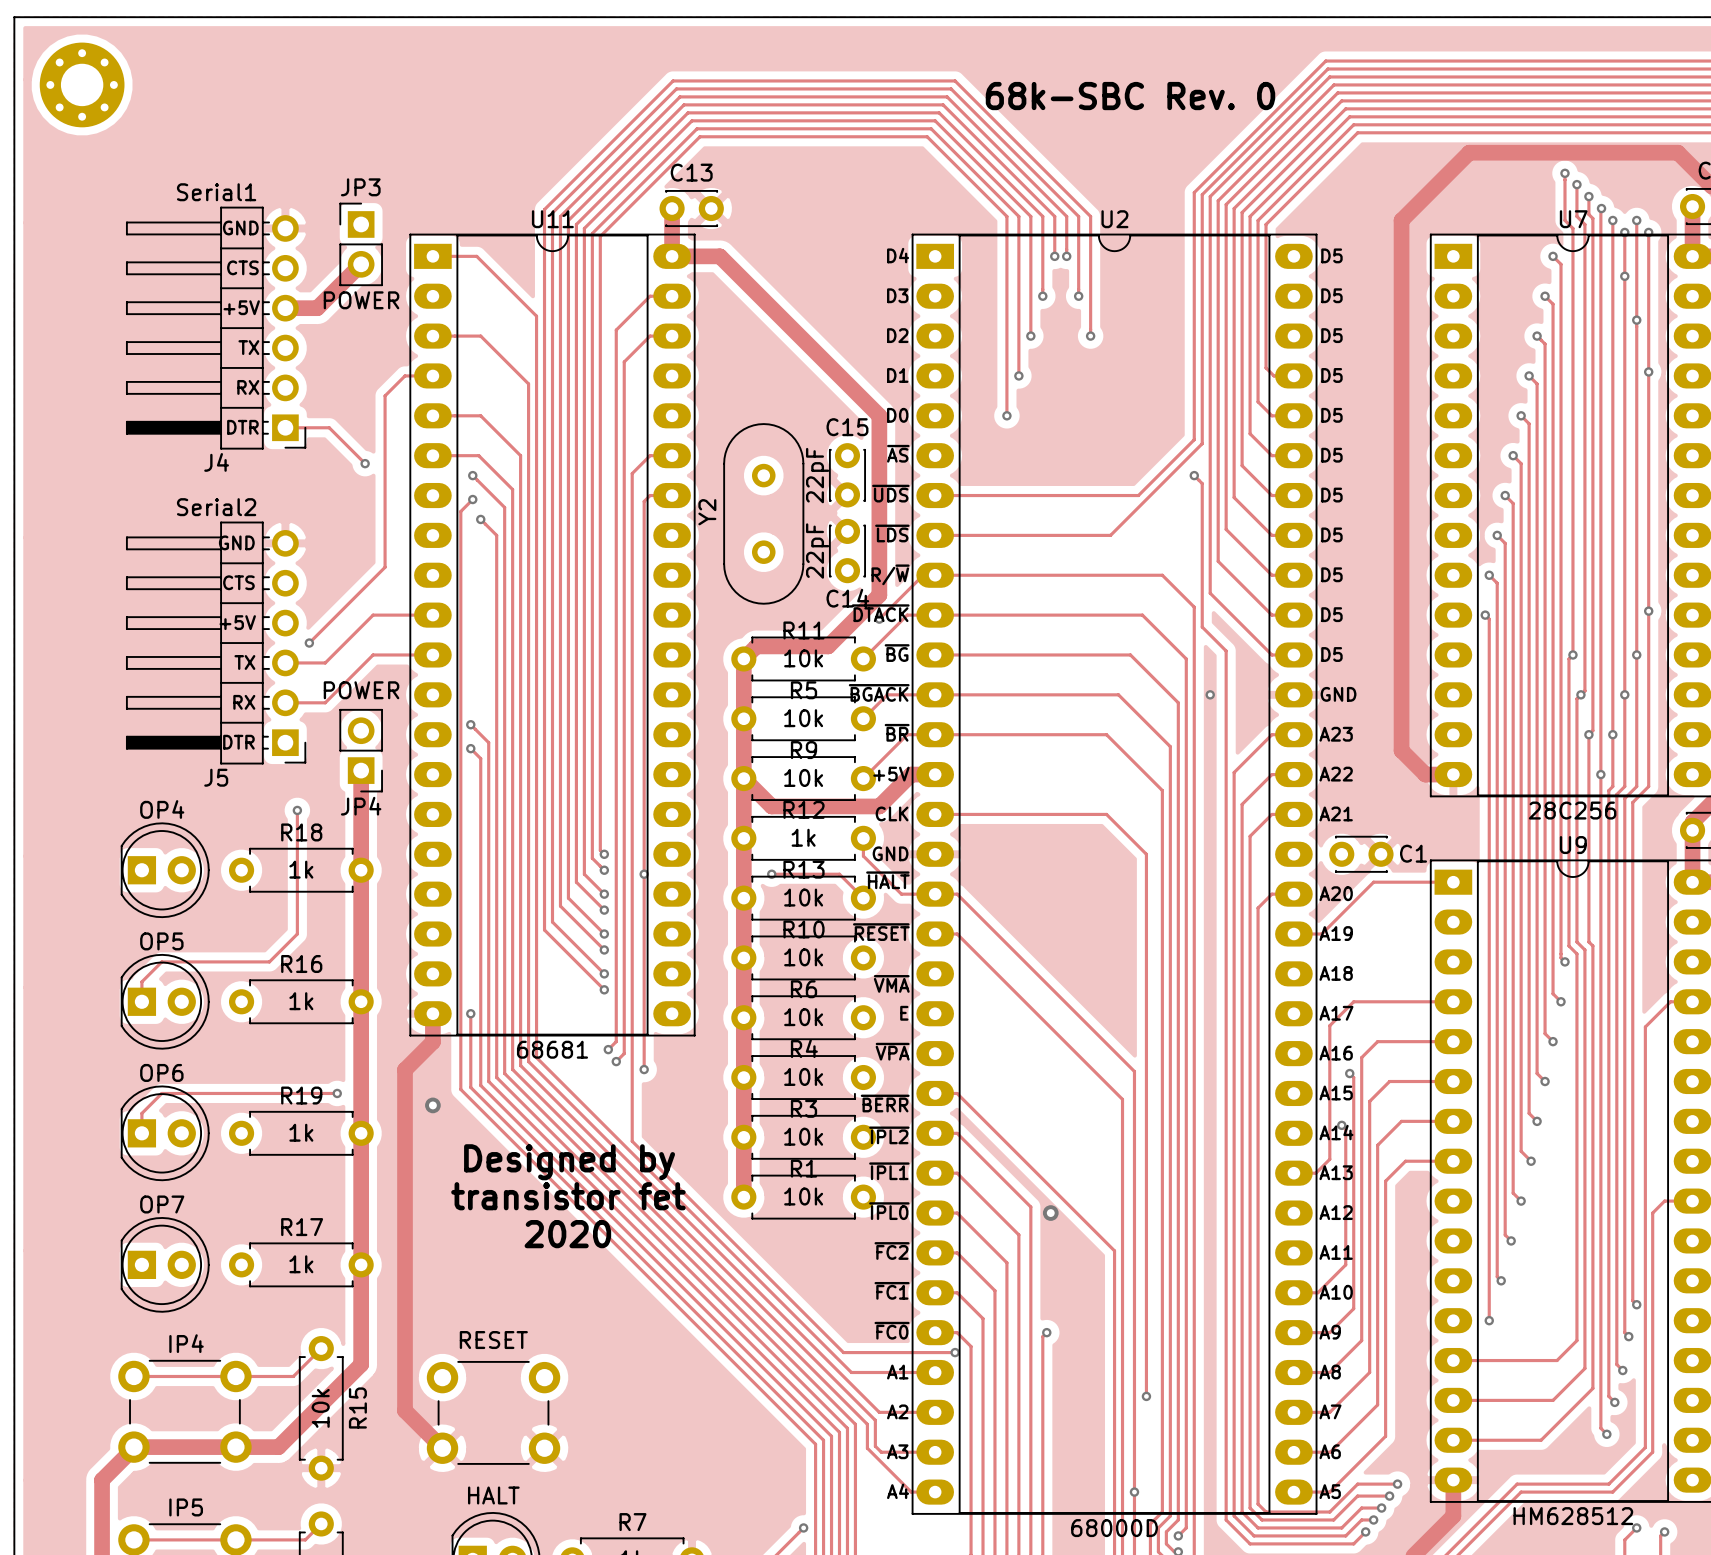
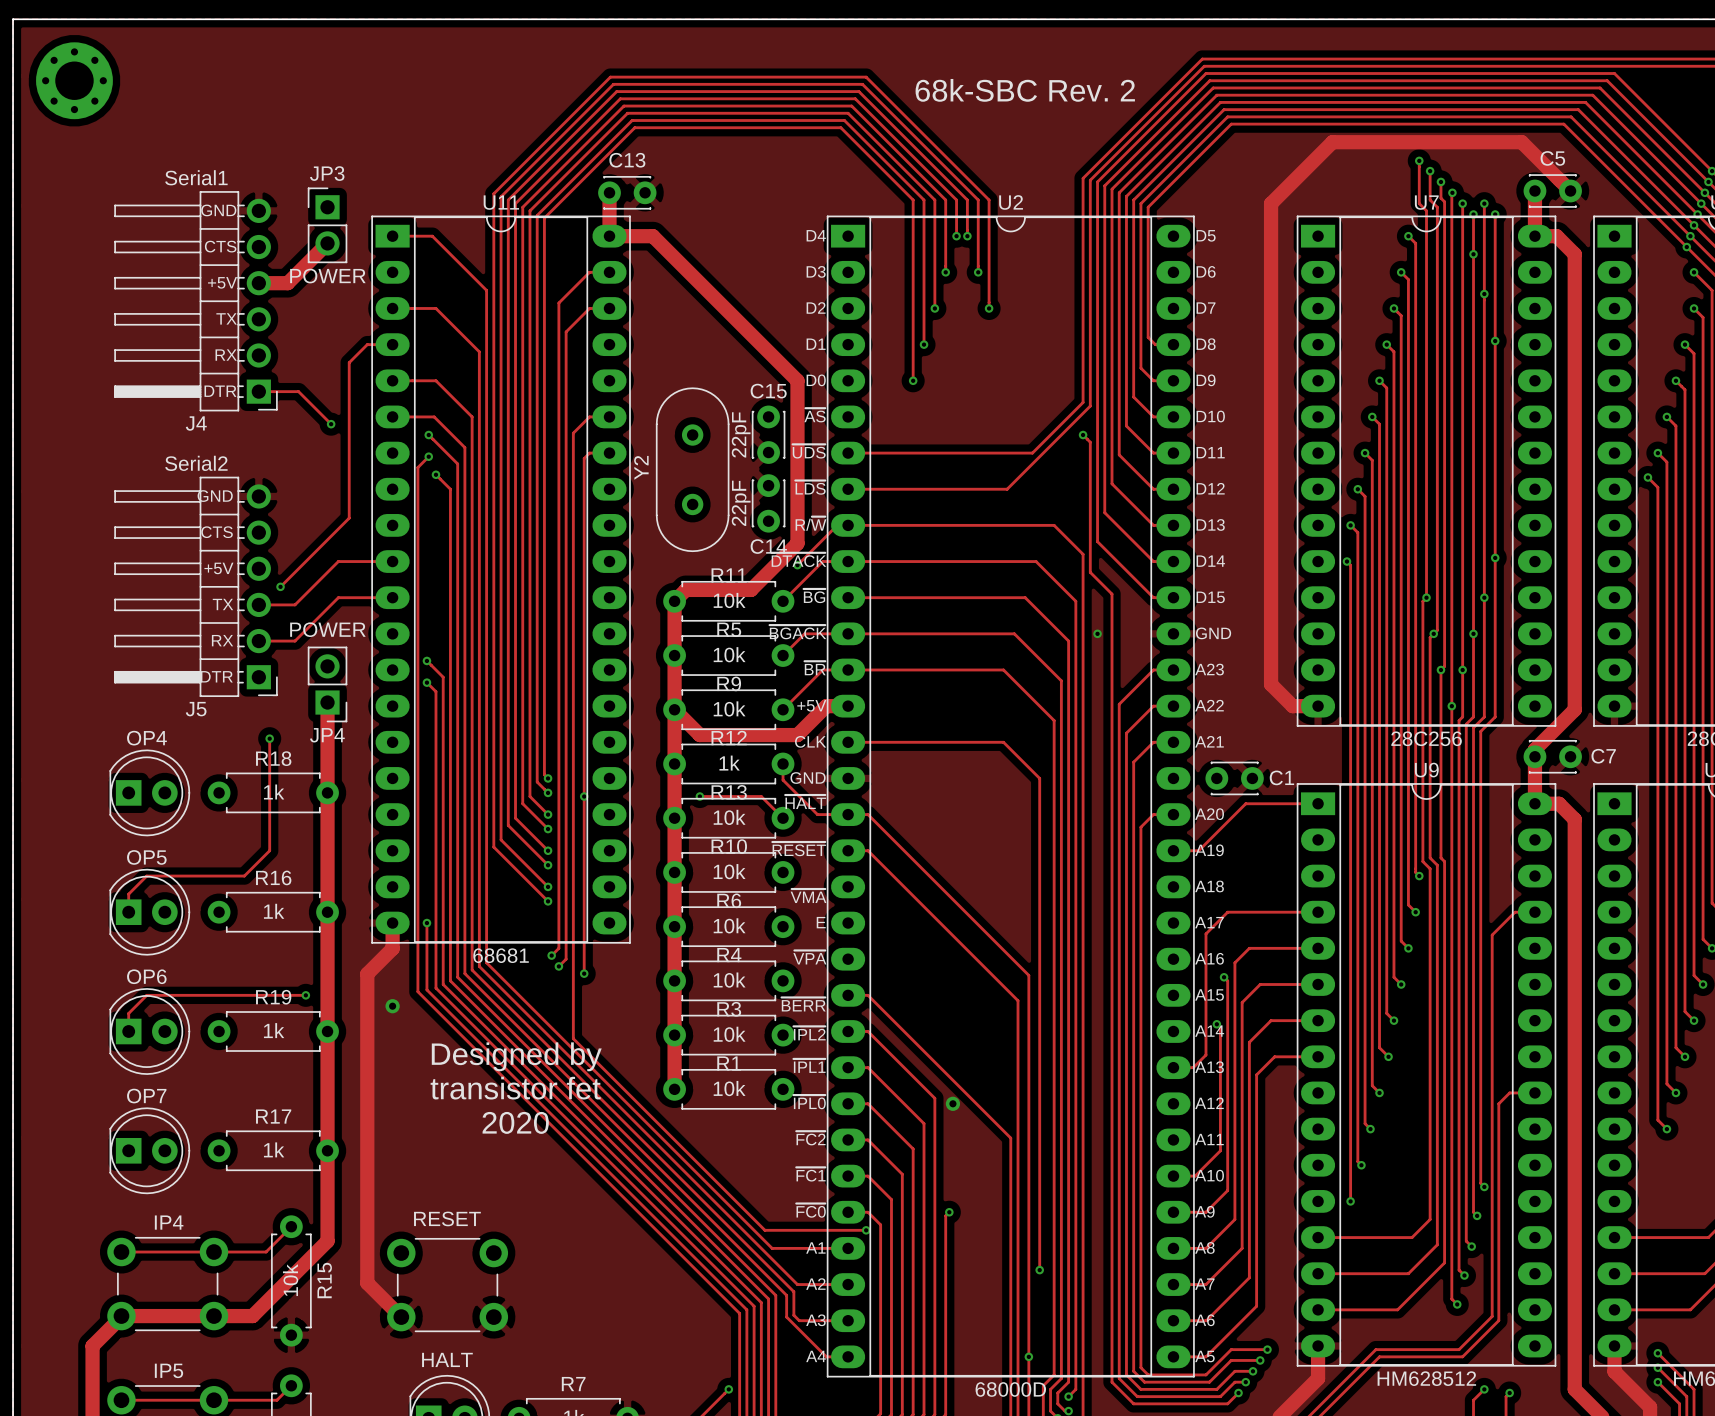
text: 68k-SBC Rev. 0 (1130, 96) -> 68k-SBC Rev. 2 (1025, 90)
text: D5 (1331, 295) -> D6 (1206, 271)
text: D5 (1331, 335) -> D7 (1205, 308)
text: D5 (1331, 375) -> D8 (1206, 344)
text: D5 (1331, 415) -> D9 (1206, 380)
text: D5 (1331, 455) -> D10 (1210, 416)
text: D5 (1331, 495) -> D11 (1210, 452)
text: D5 (1331, 534) -> D12 (1210, 488)
text: D5 (1331, 574) -> D13 (1210, 524)
text: D5 (1331, 614) -> D14 (1210, 561)
text: D5 (1331, 654) -> D15 (1210, 597)

